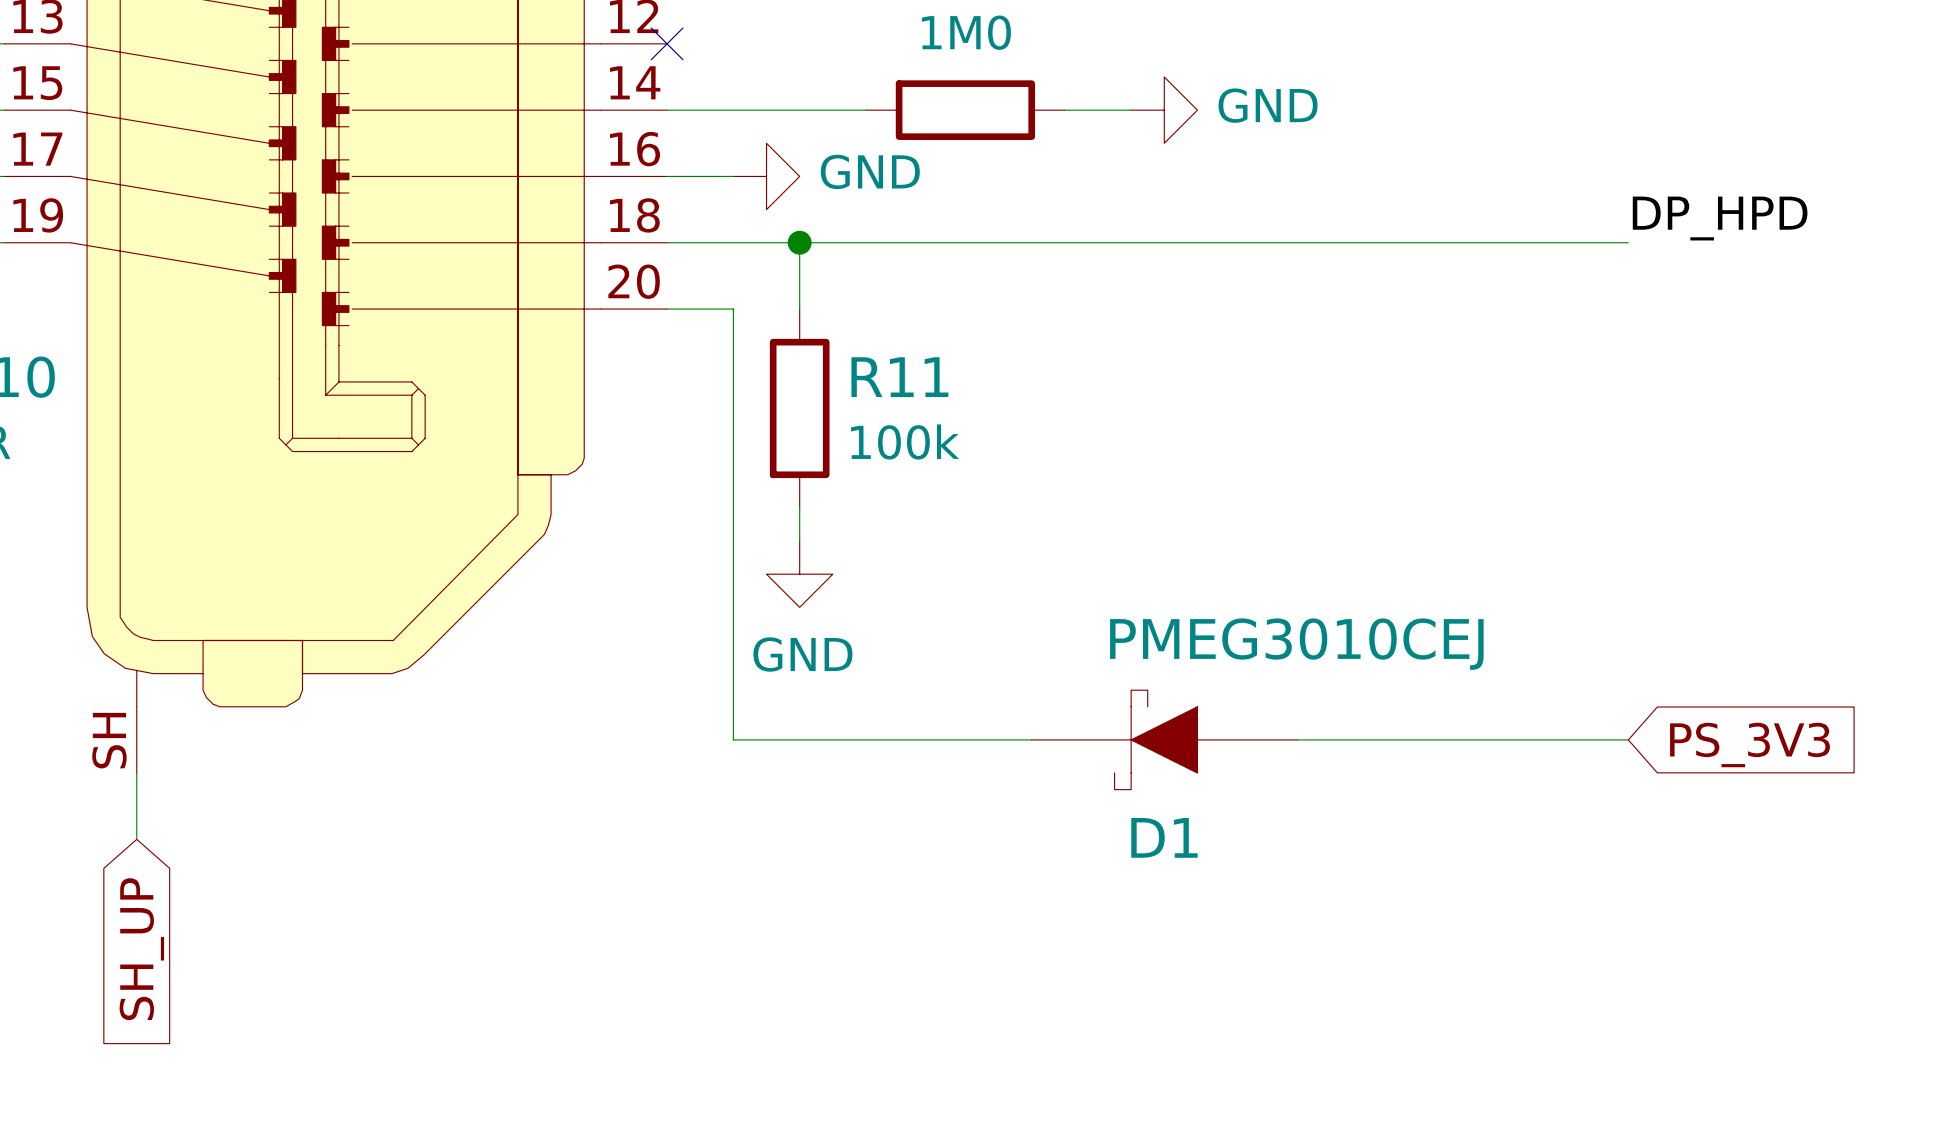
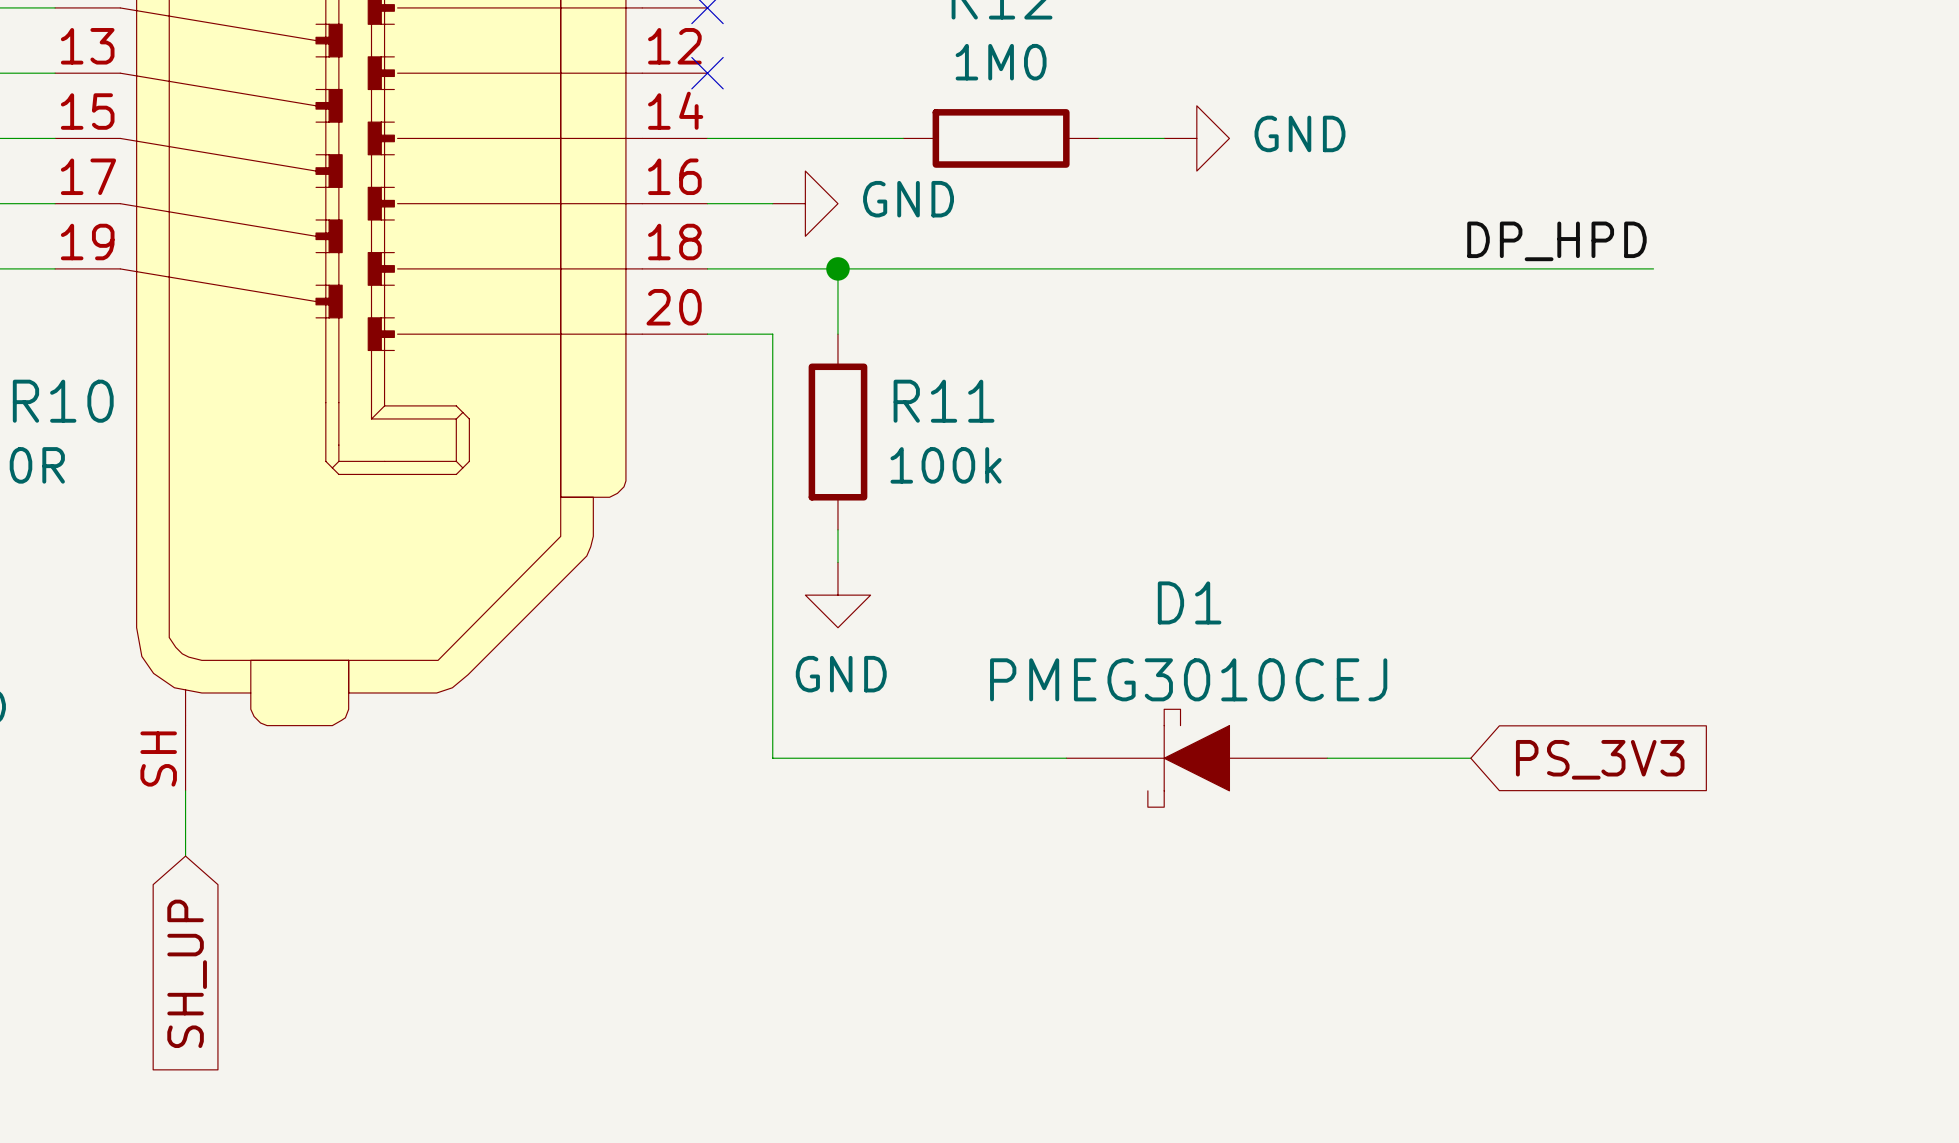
label position: DP_HPD (1720, 218) -> DP_HPD (1556, 241)
D1 value position: PMEG3010CEJ (1296, 644) -> PMEG3010CEJ (1188, 679)
wire: (1442, 739) (1628, 739) -> none
global label position: PS_3V3 (1750, 744) -> PS_3V3 (1600, 759)
D1 name position: D1 (1164, 837) -> D1 (1189, 602)

